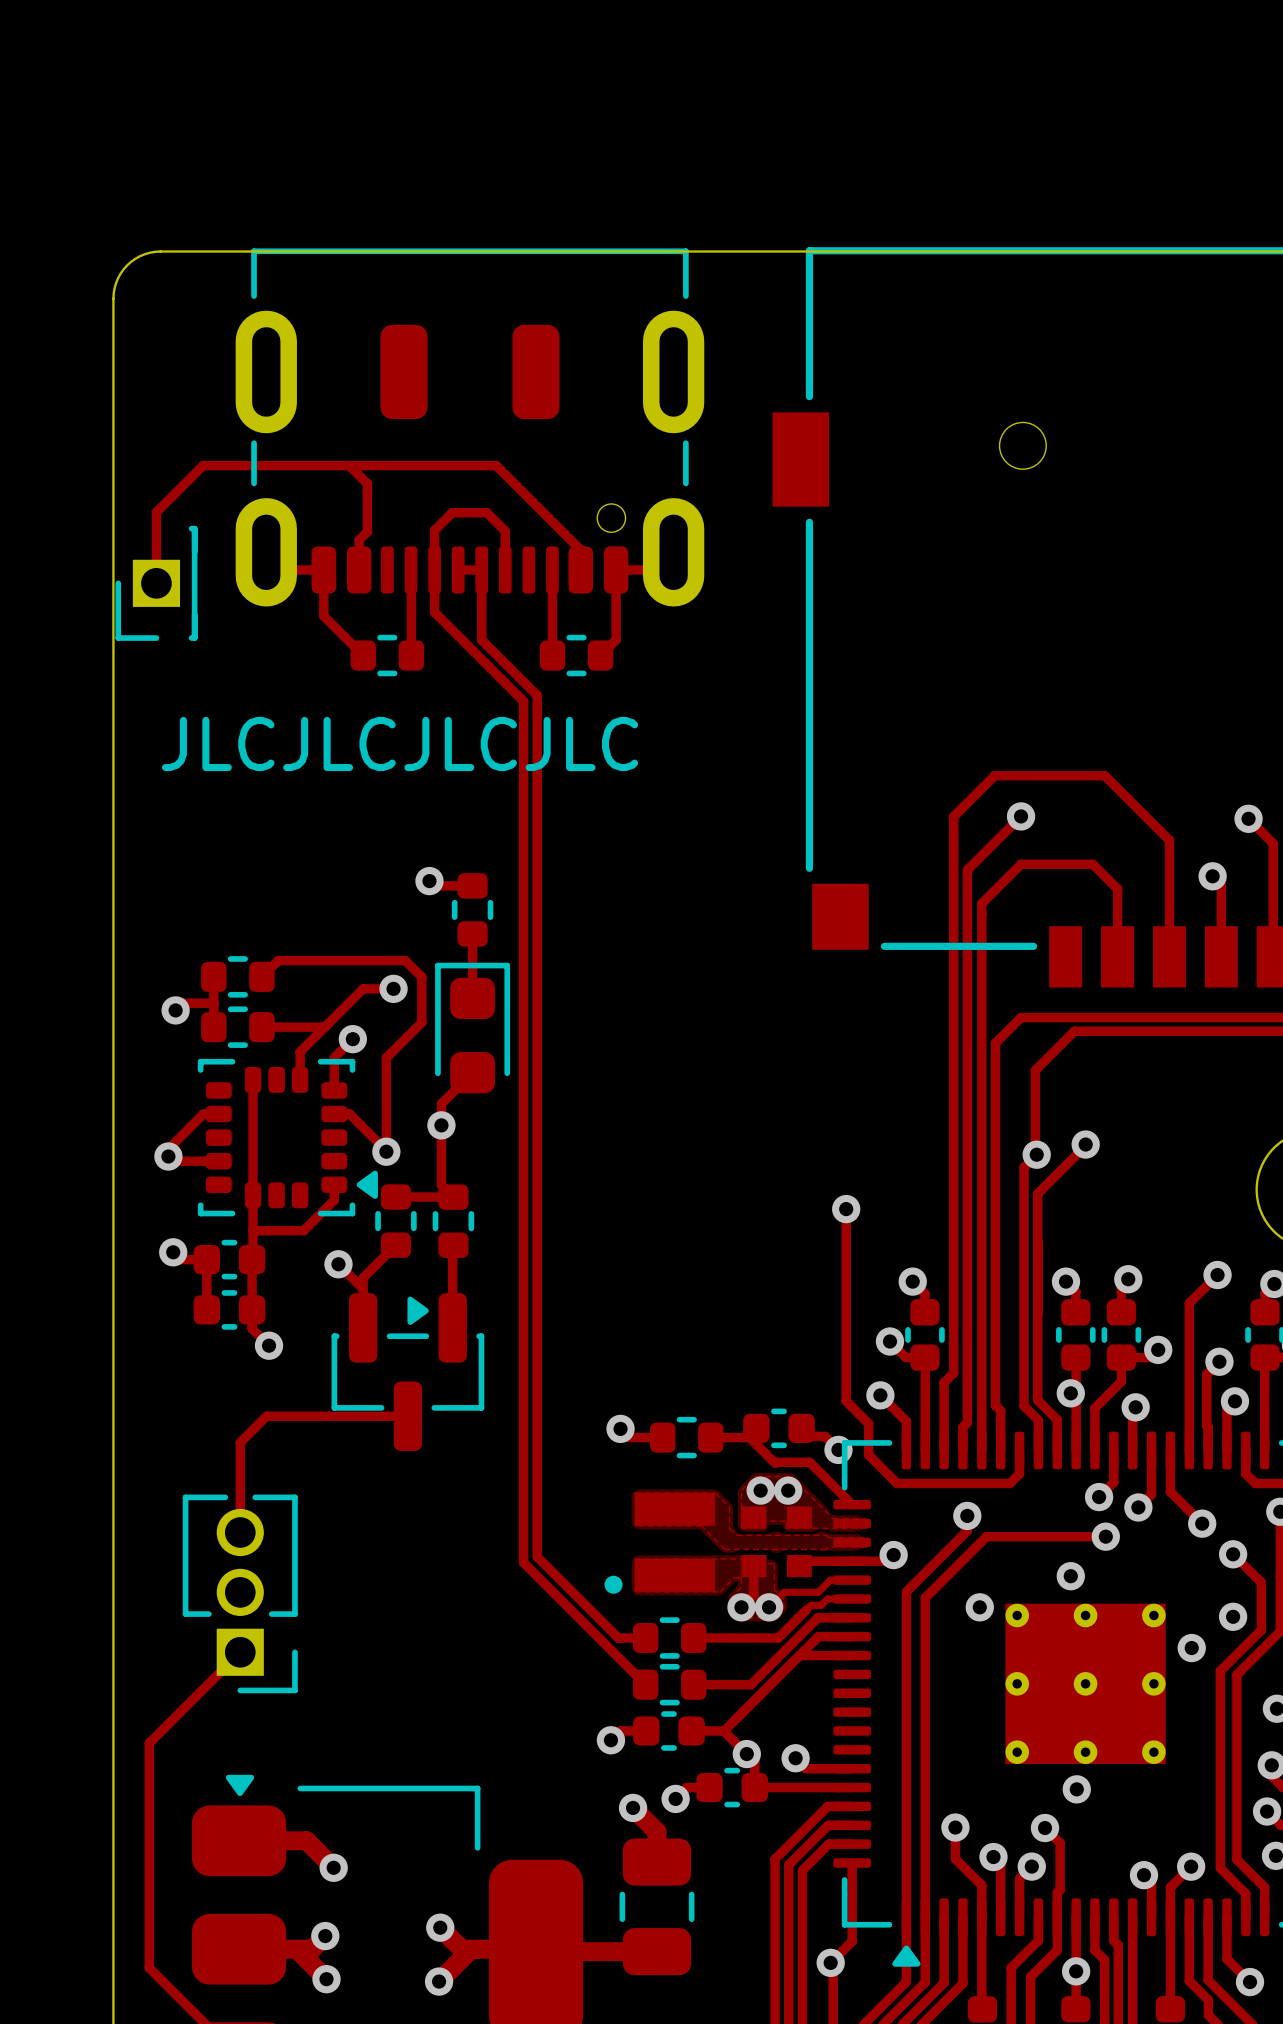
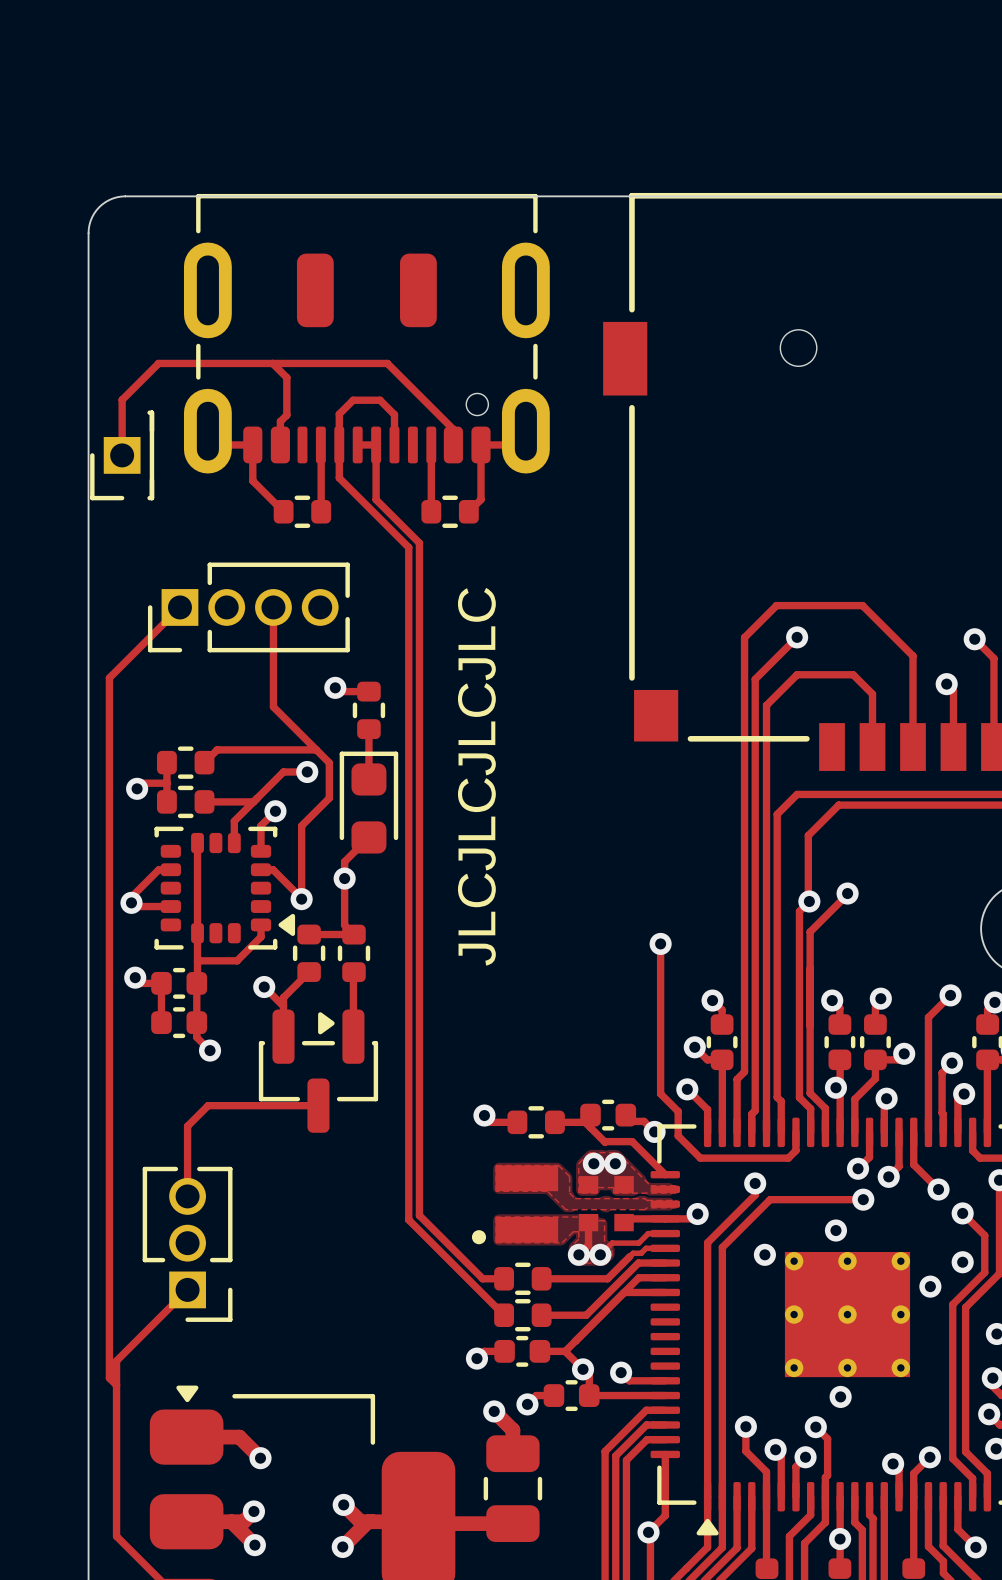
text rotation: 0° (400, 743) -> 90° counterclockwise (476, 776)
track: none -> (179, 607) (109, 678) (109, 1378) (116, 1385)
part: none -> (248, 607)
track: none -> (273, 607) (273, 706) (316, 749)

